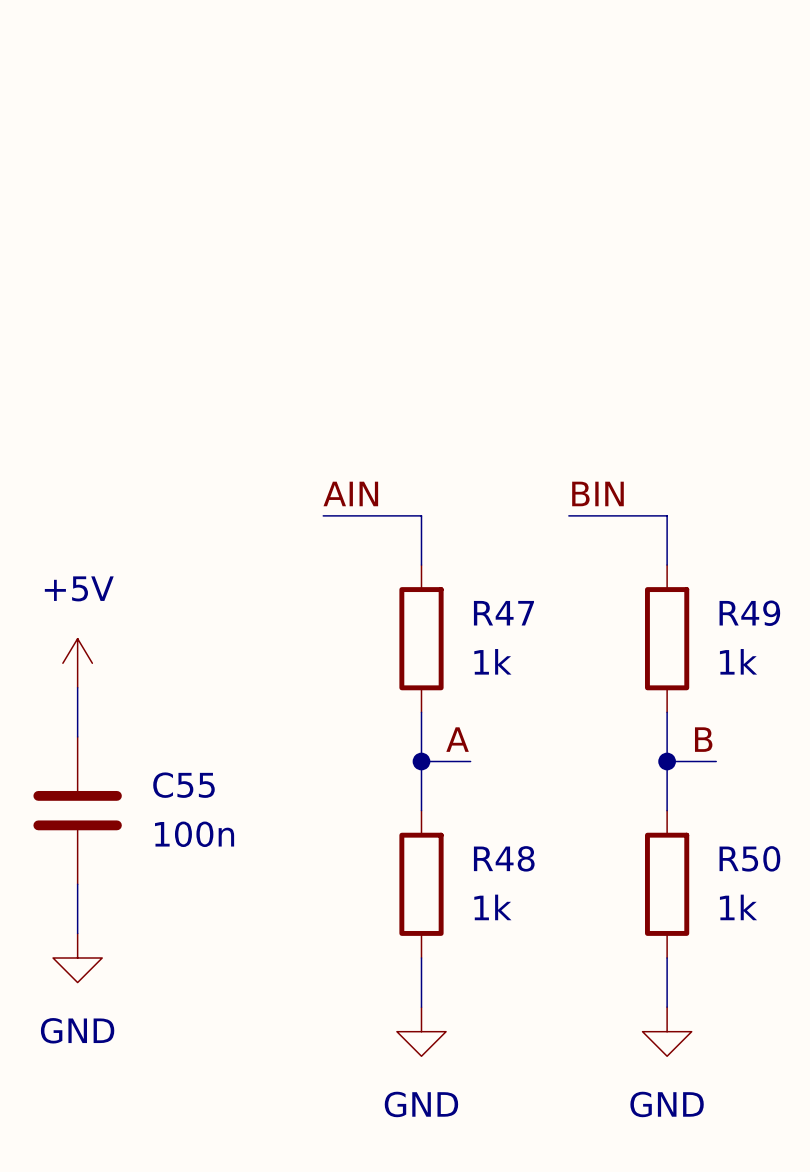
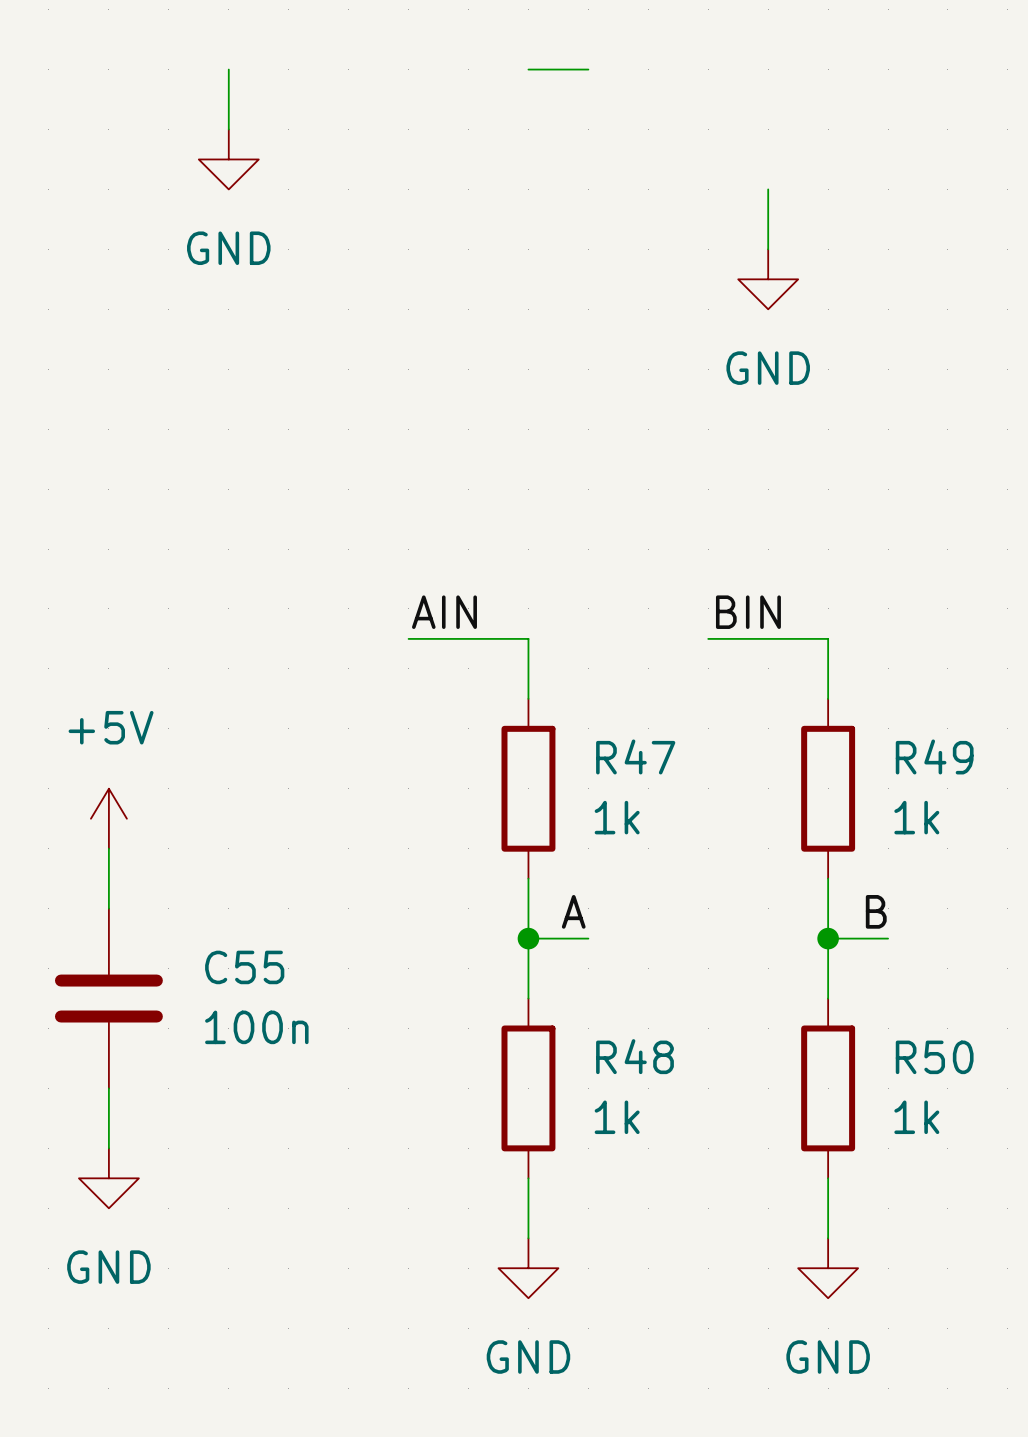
wire: none -> (228, 69) (228, 129)
wire: none -> (528, 69) (588, 69)
power symbol: none -> GND (228, 159)
wire: none -> (768, 189) (768, 249)
power symbol: none -> GND (768, 279)

